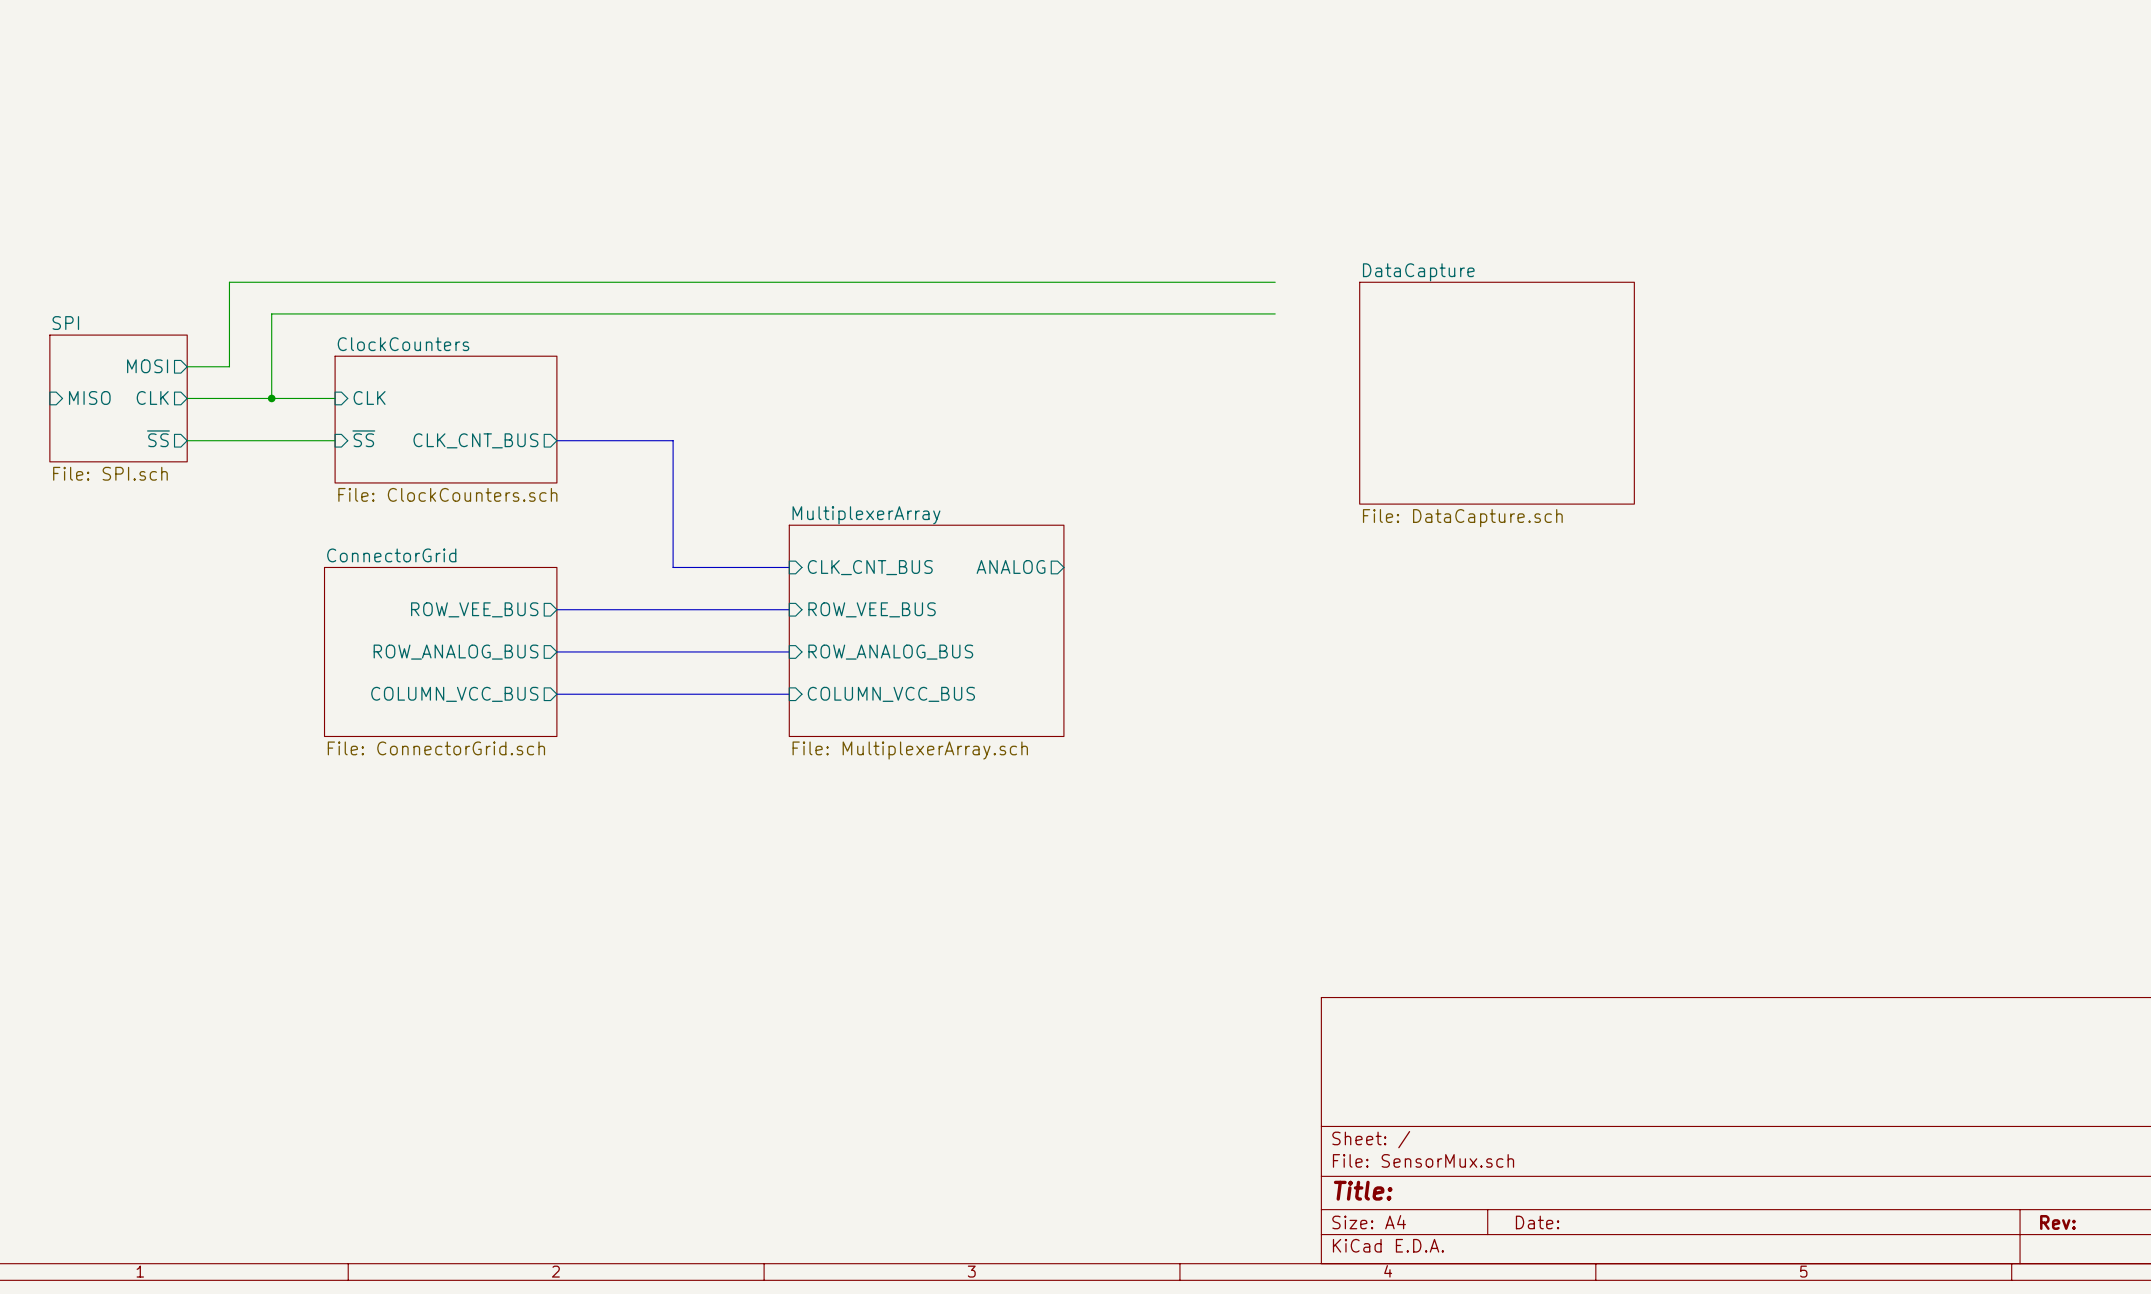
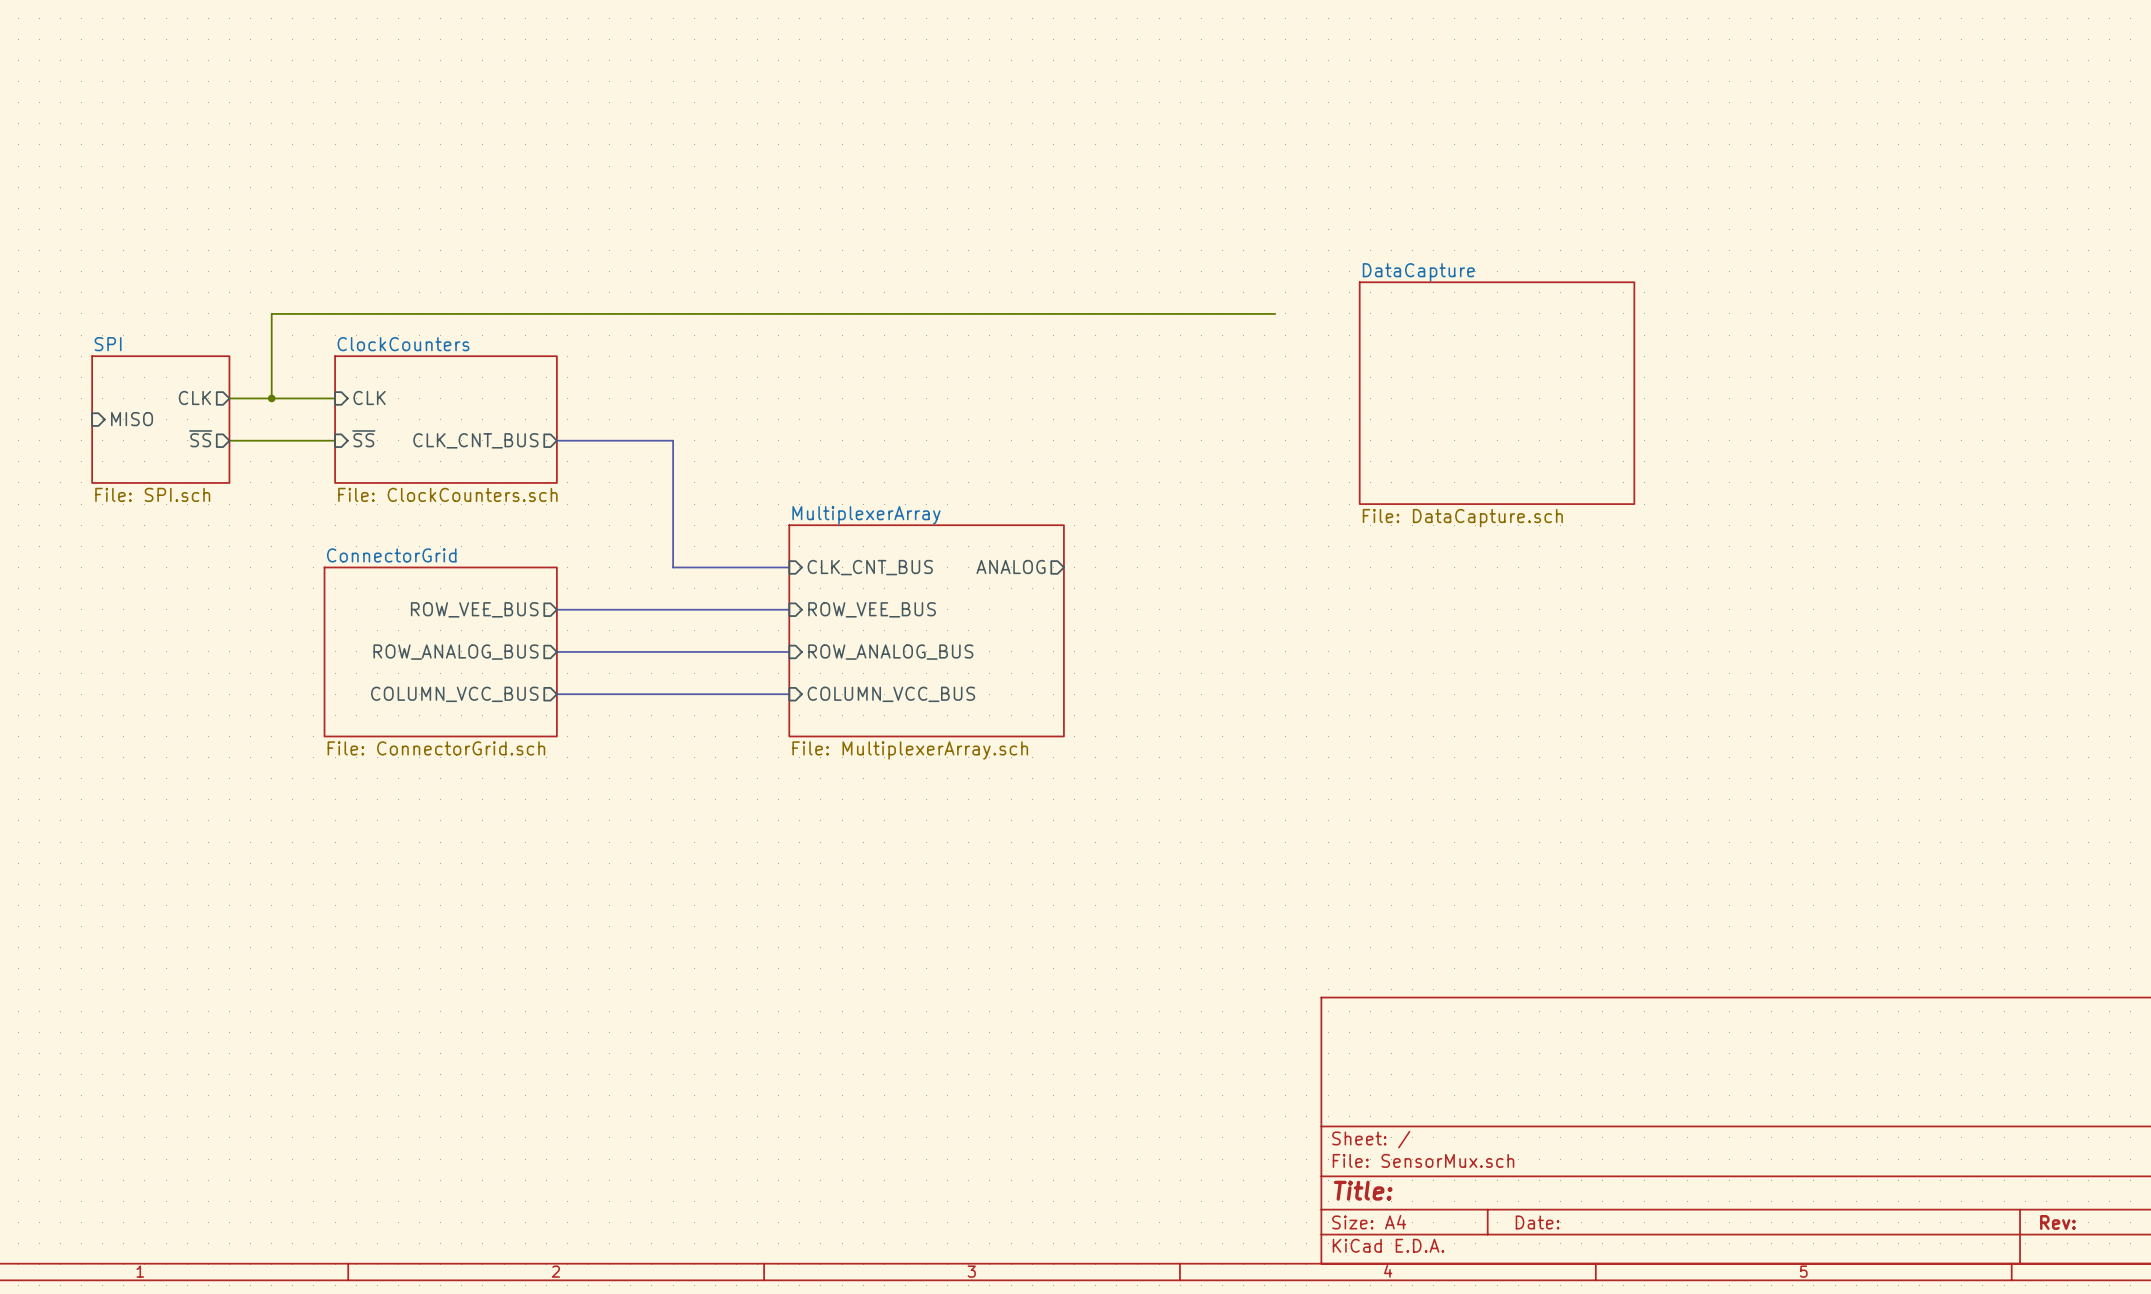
wire: (1275, 282) (229, 282) (229, 366) (187, 366) -> none
sheet pin: MOSI (147, 366) -> none
sheet pin position: MISO (89, 397) -> MISO (132, 419)
sheet pin position: CLK (152, 397) -> CLK (194, 397)
sheet SPI position: (118, 398) -> (160, 419)
wire: (187, 398) (229, 398) -> none
sheet pin position: ~{SS} (158, 438) -> ~{SS} (200, 438)
wire: (187, 440) (229, 440) -> none

